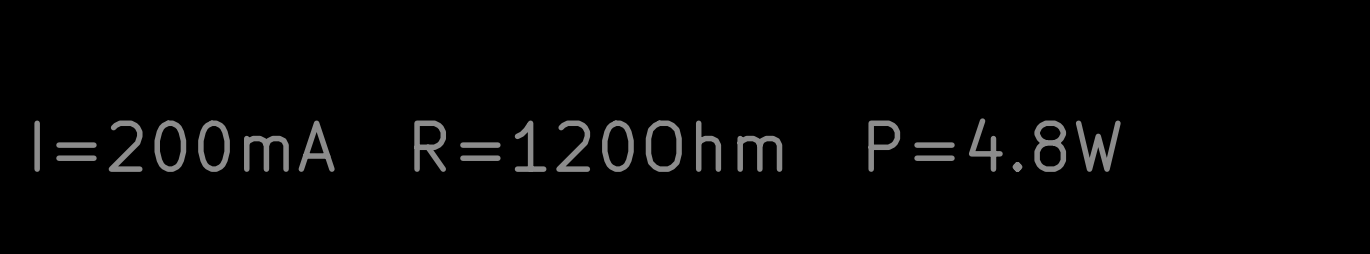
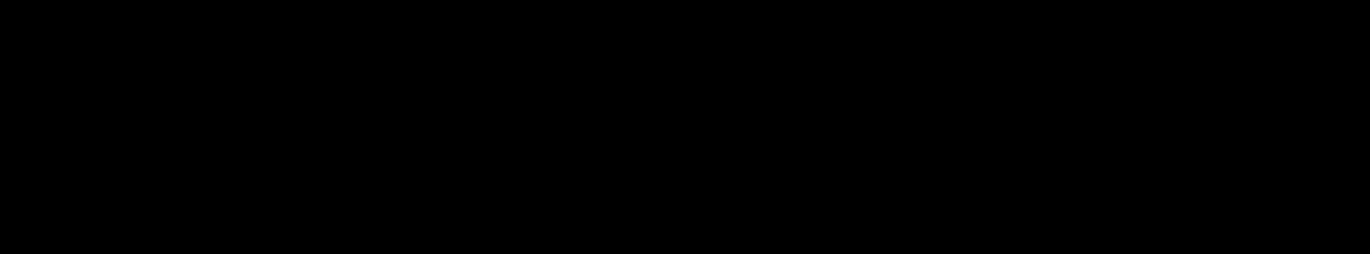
text: I=200mA R=120Ohm P=4.8W (577, 145) -> none

